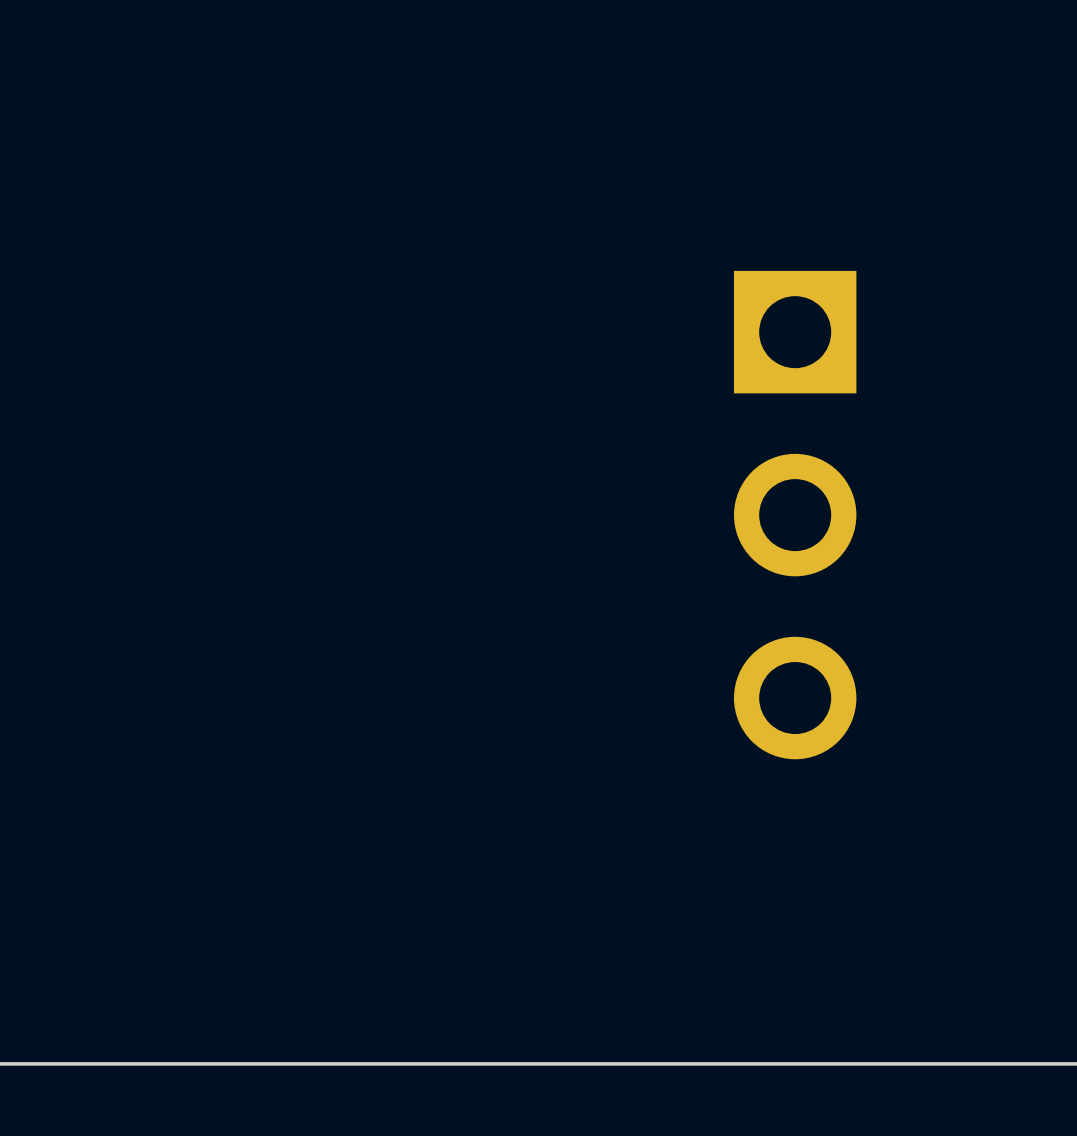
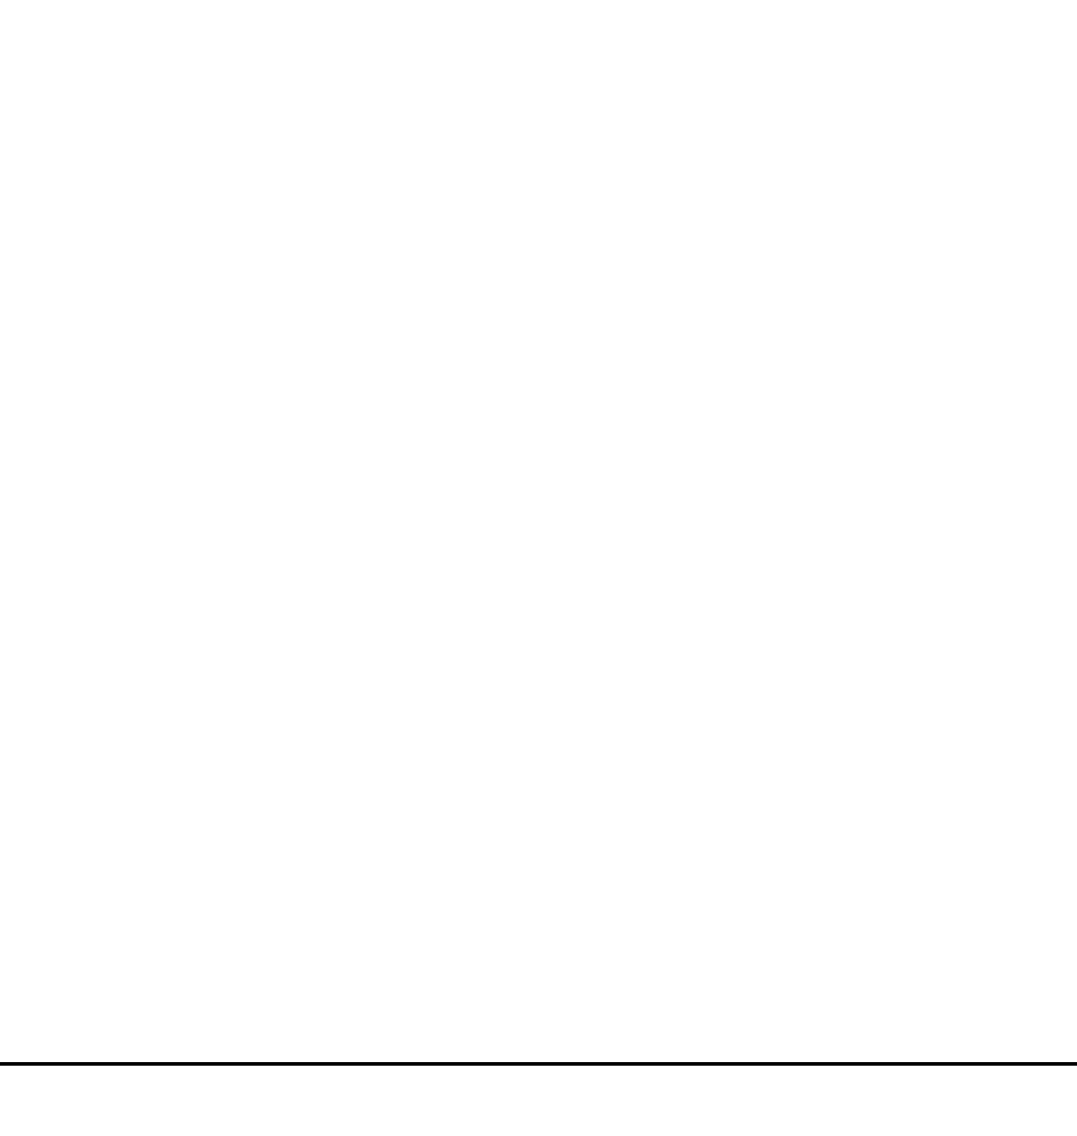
part: (795, 515) -> none

